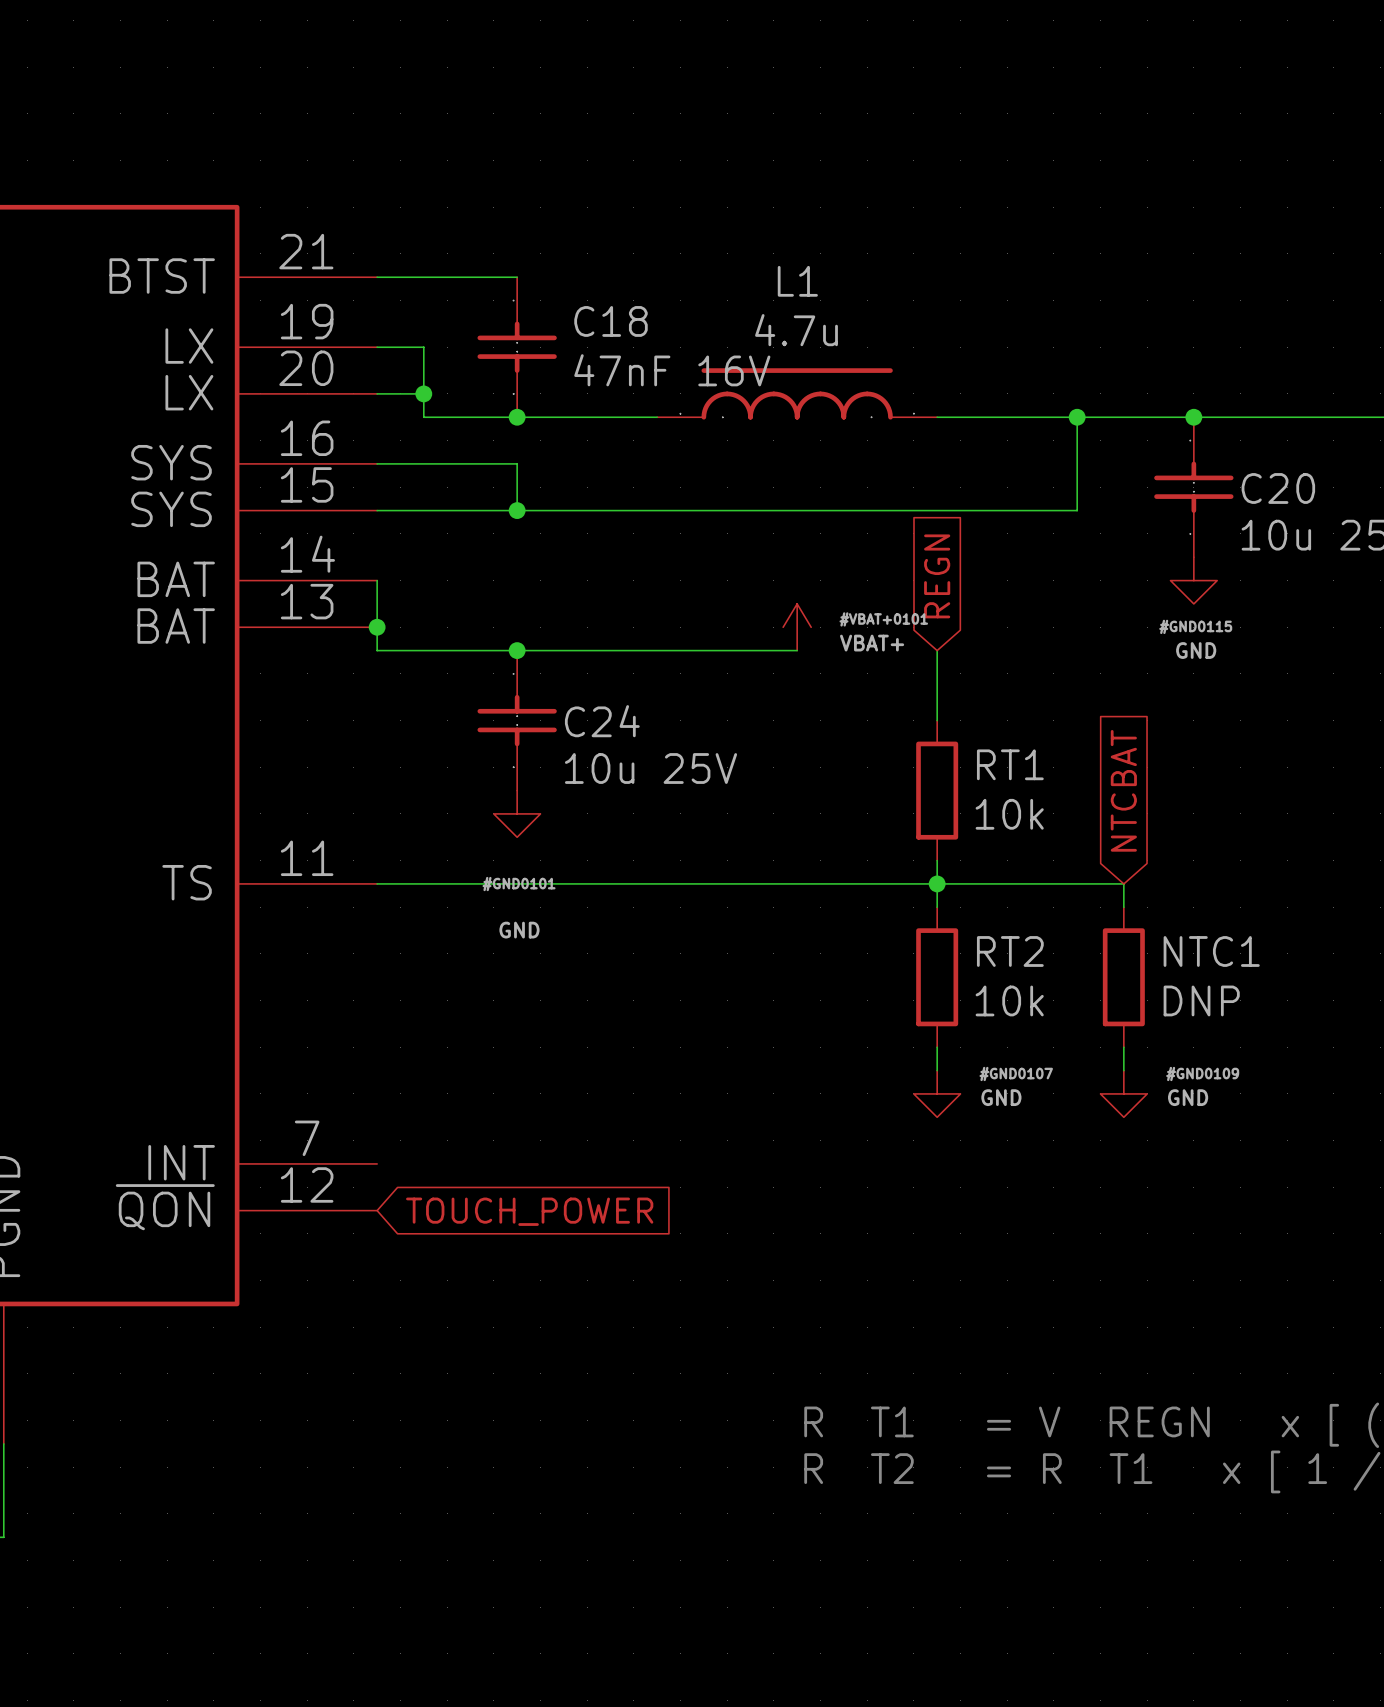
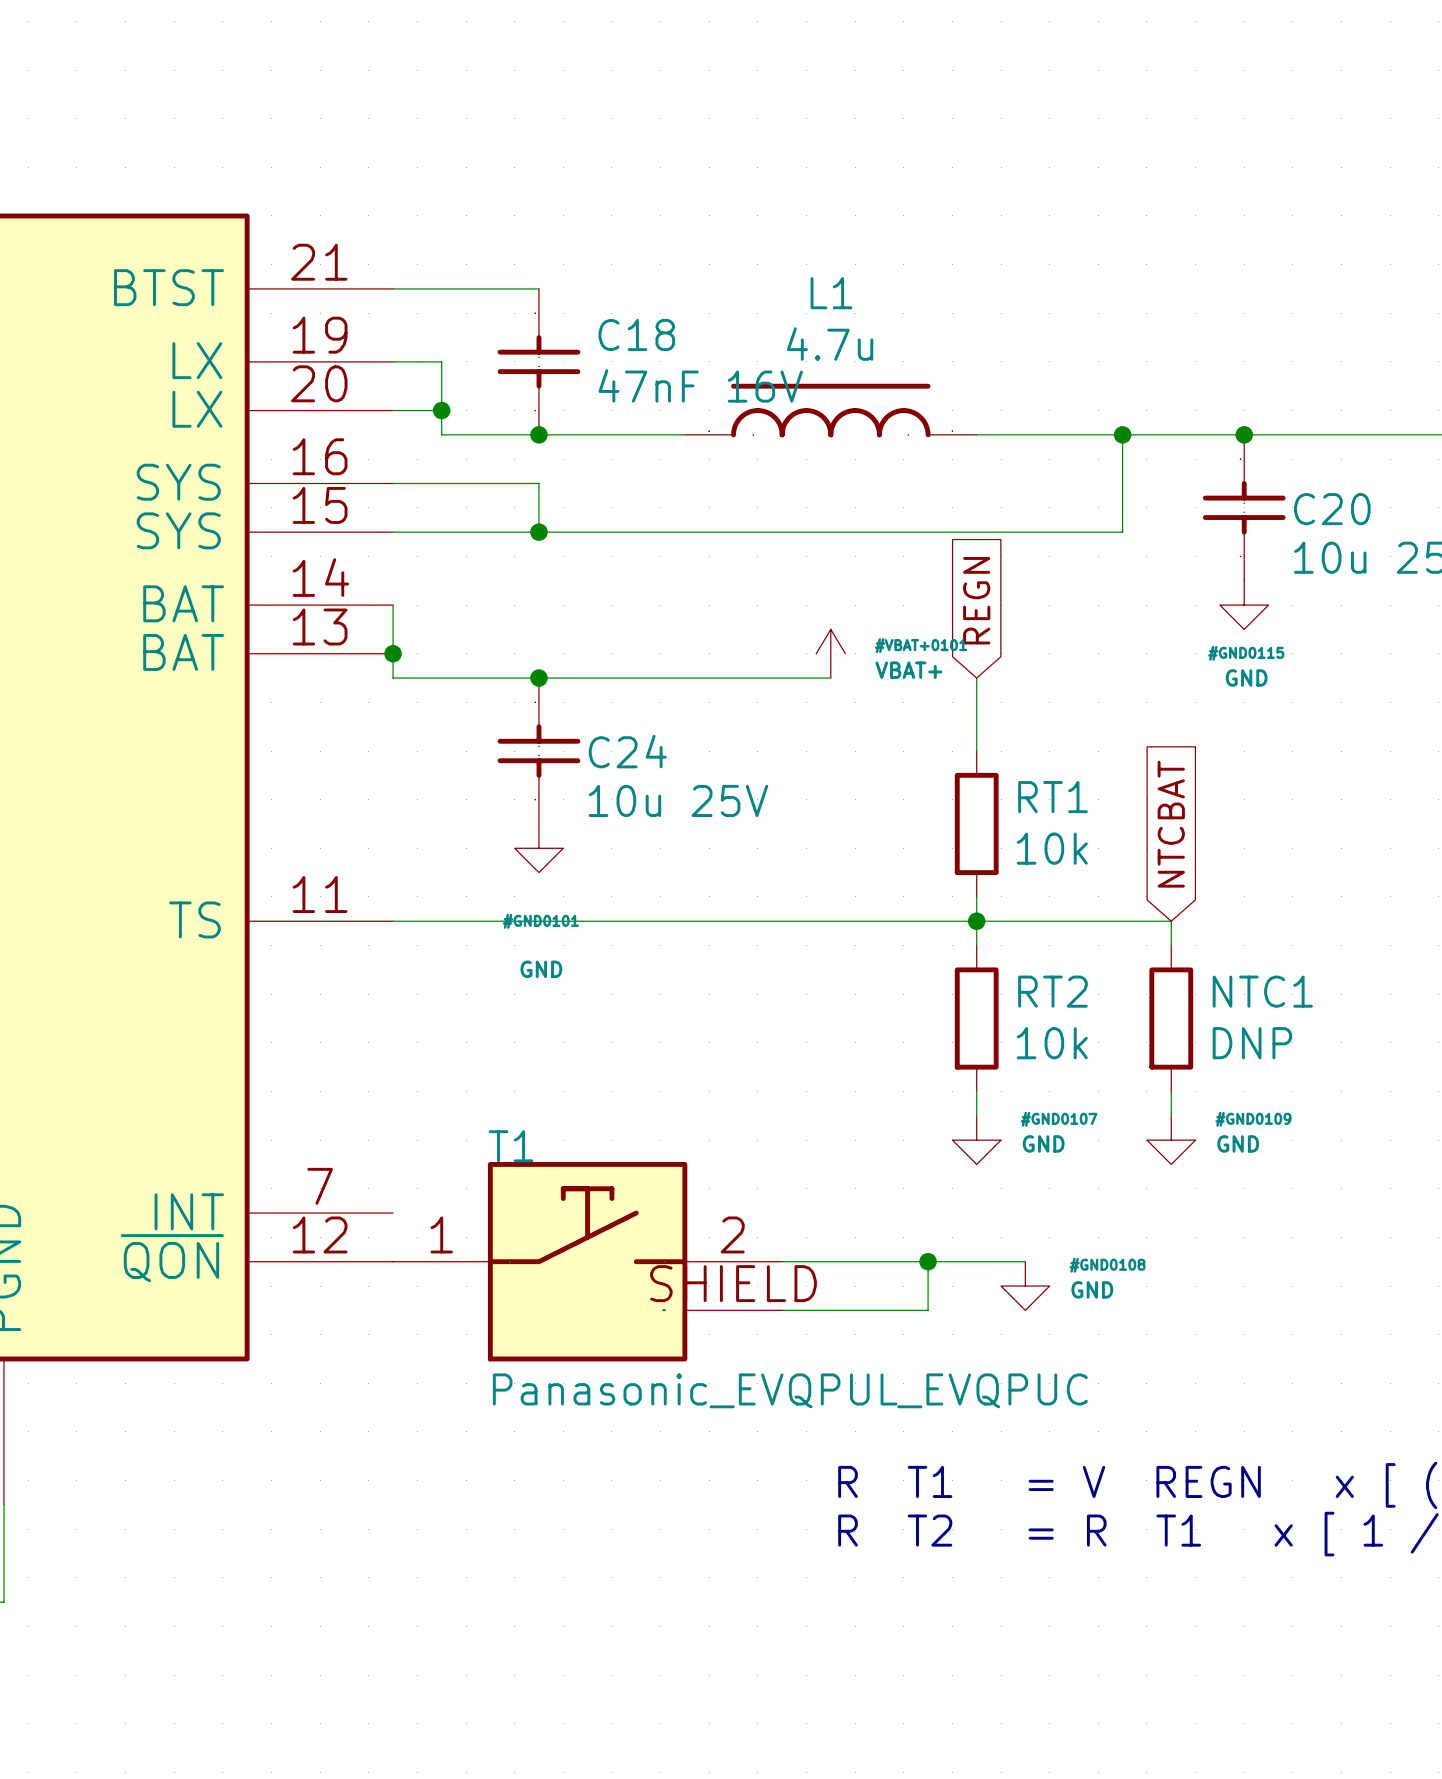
T1: none -> Panasonic_EVQPUL_EVQPUC (587, 1261)
wire: none -> (782, 1261) (1025, 1261)
wire: none -> (928, 1261) (928, 1310) (782, 1310)
junction: none -> (928, 1261)
global label: TOUCH_POWER (529, 1211) -> none
#GND0108: none -> GND (1025, 1286)

